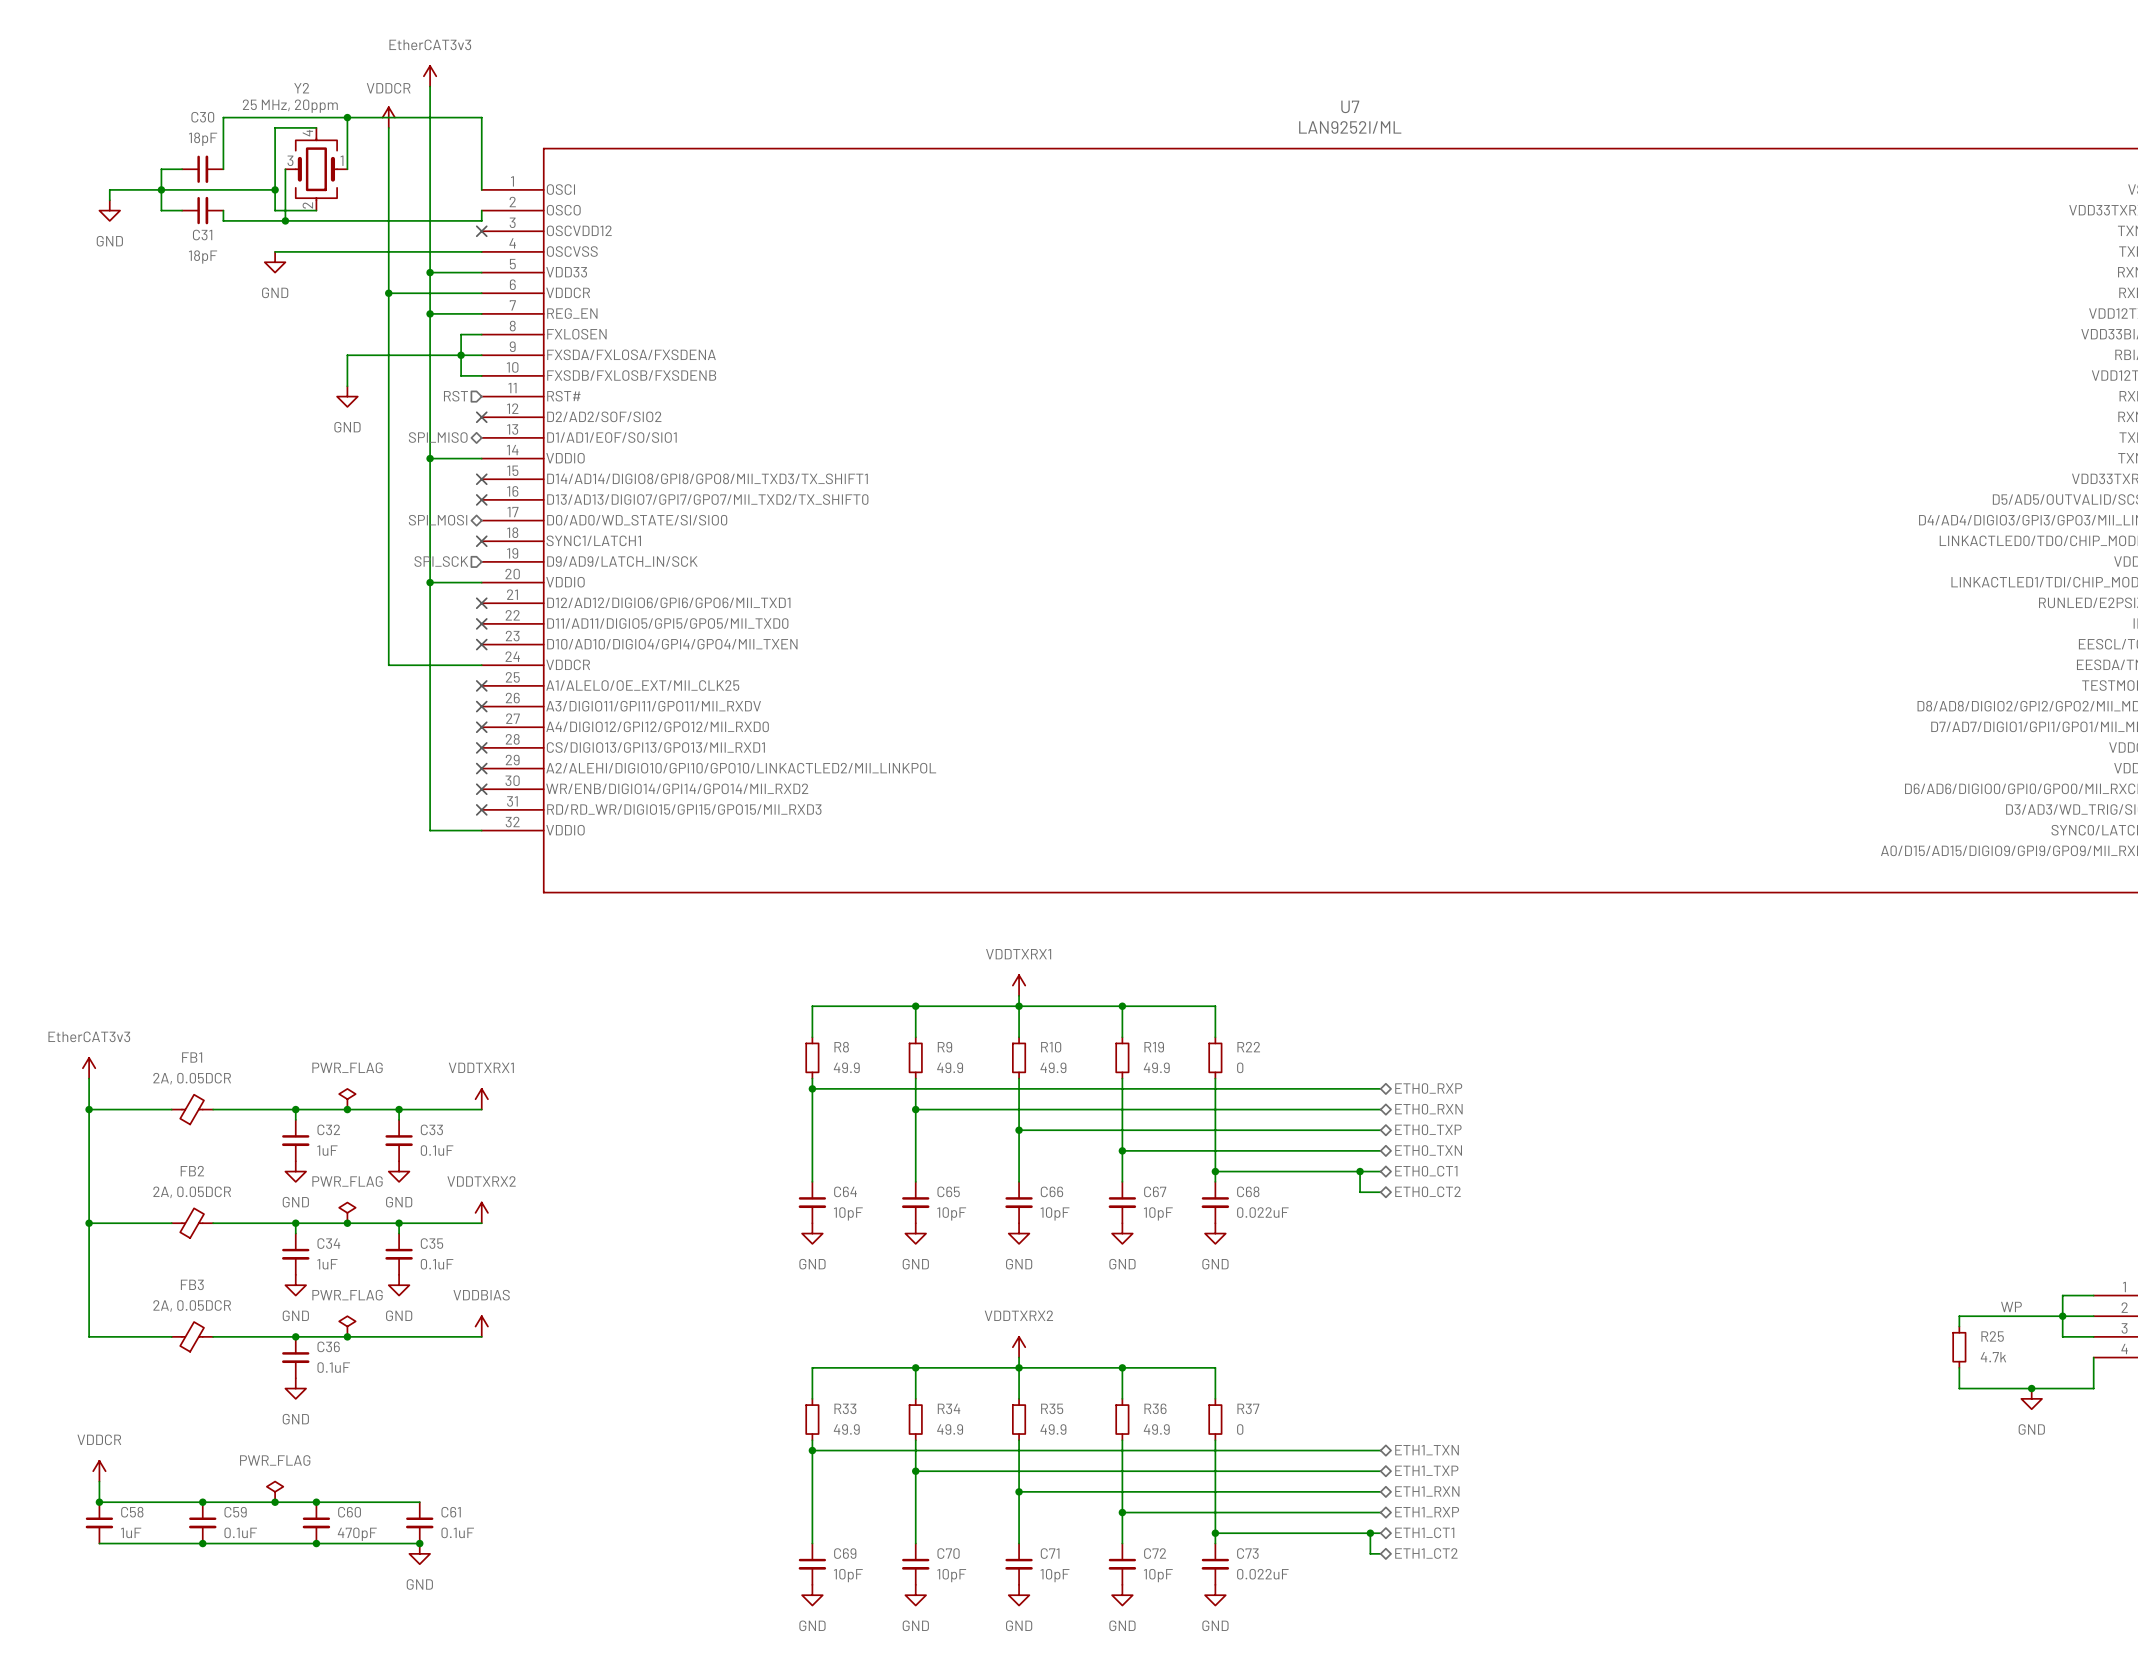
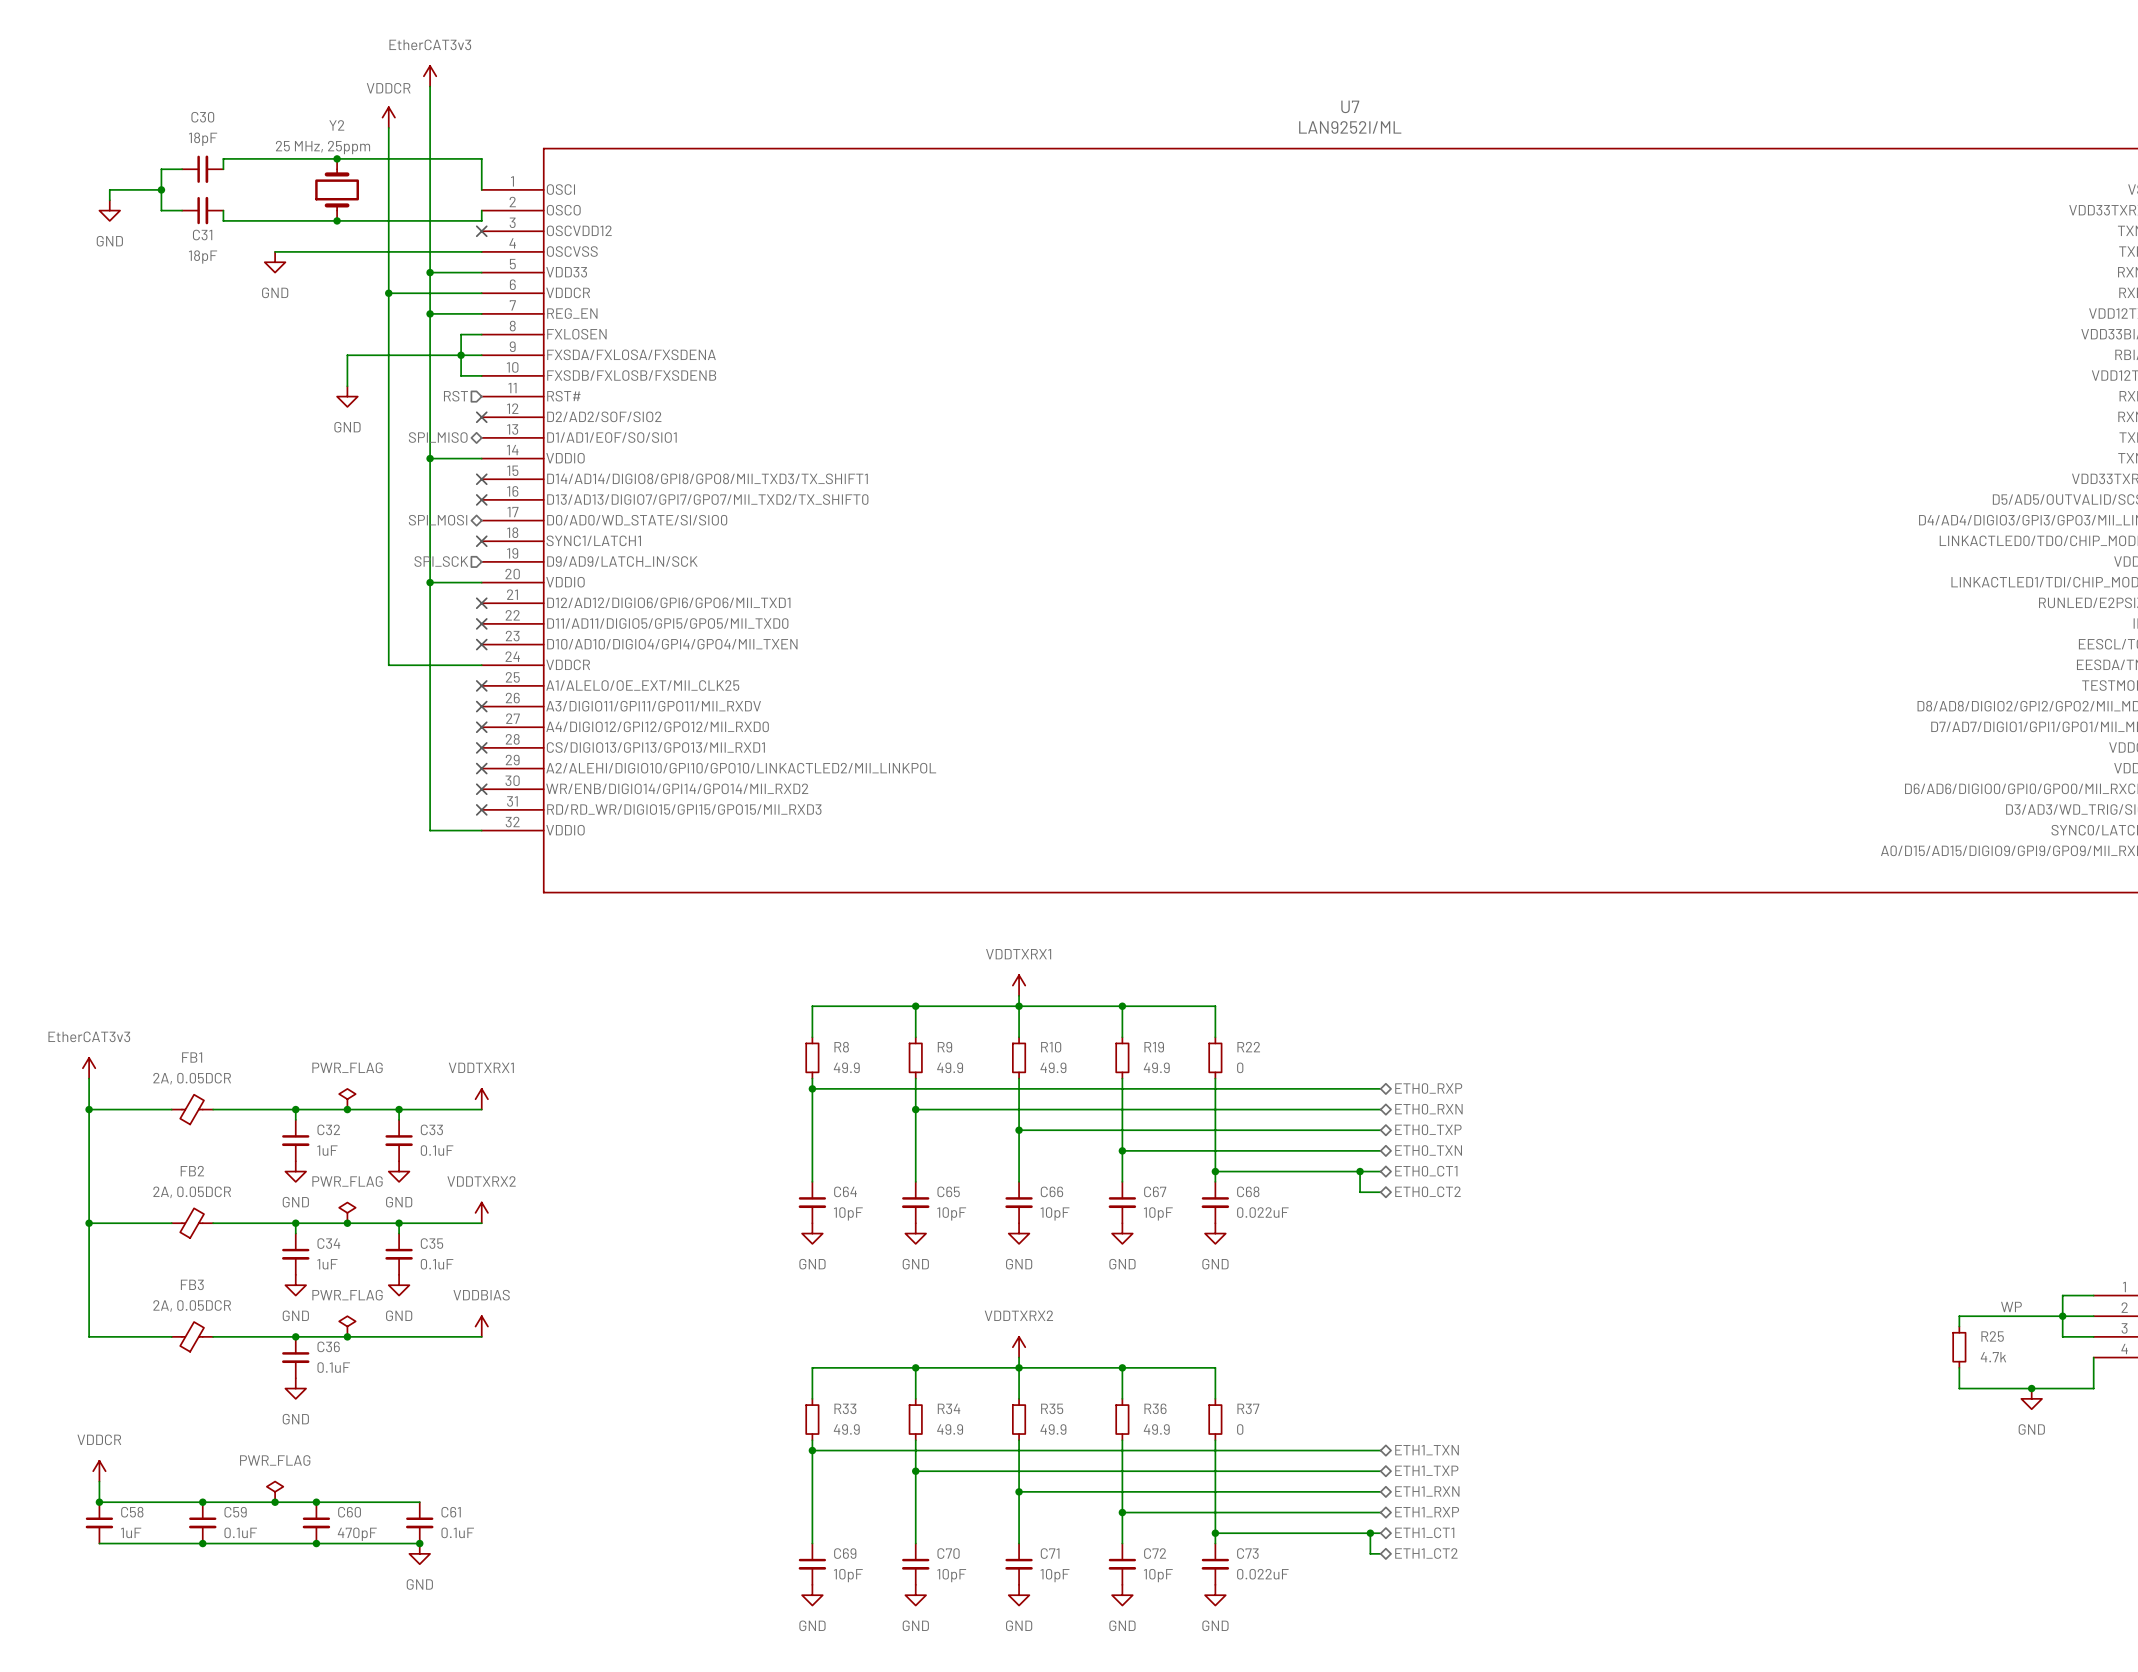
Y2 name position: Y2 (301, 88) -> Y2 (336, 125)
Y2 value: 25 MHz, 20ppm (290, 106) -> 25 MHz, 25ppm (323, 147)
wire: (347, 117) (347, 169) -> none
junction: (347, 117) -> none
Y2 symbol: [285, 127, 348, 211] -> [315, 158, 359, 221]
wire: (316, 127) (275, 127) (275, 210) (316, 210) -> none
wire: (223, 158) (223, 117) (481, 117) (481, 158) -> (223, 158) (481, 158)
junction: none -> (337, 158)
wire: (285, 169) (285, 220) -> none
wire: (161, 189) (275, 189) -> none
junction: (275, 189) -> none
junction: (285, 220) -> none
junction: none -> (337, 220)

